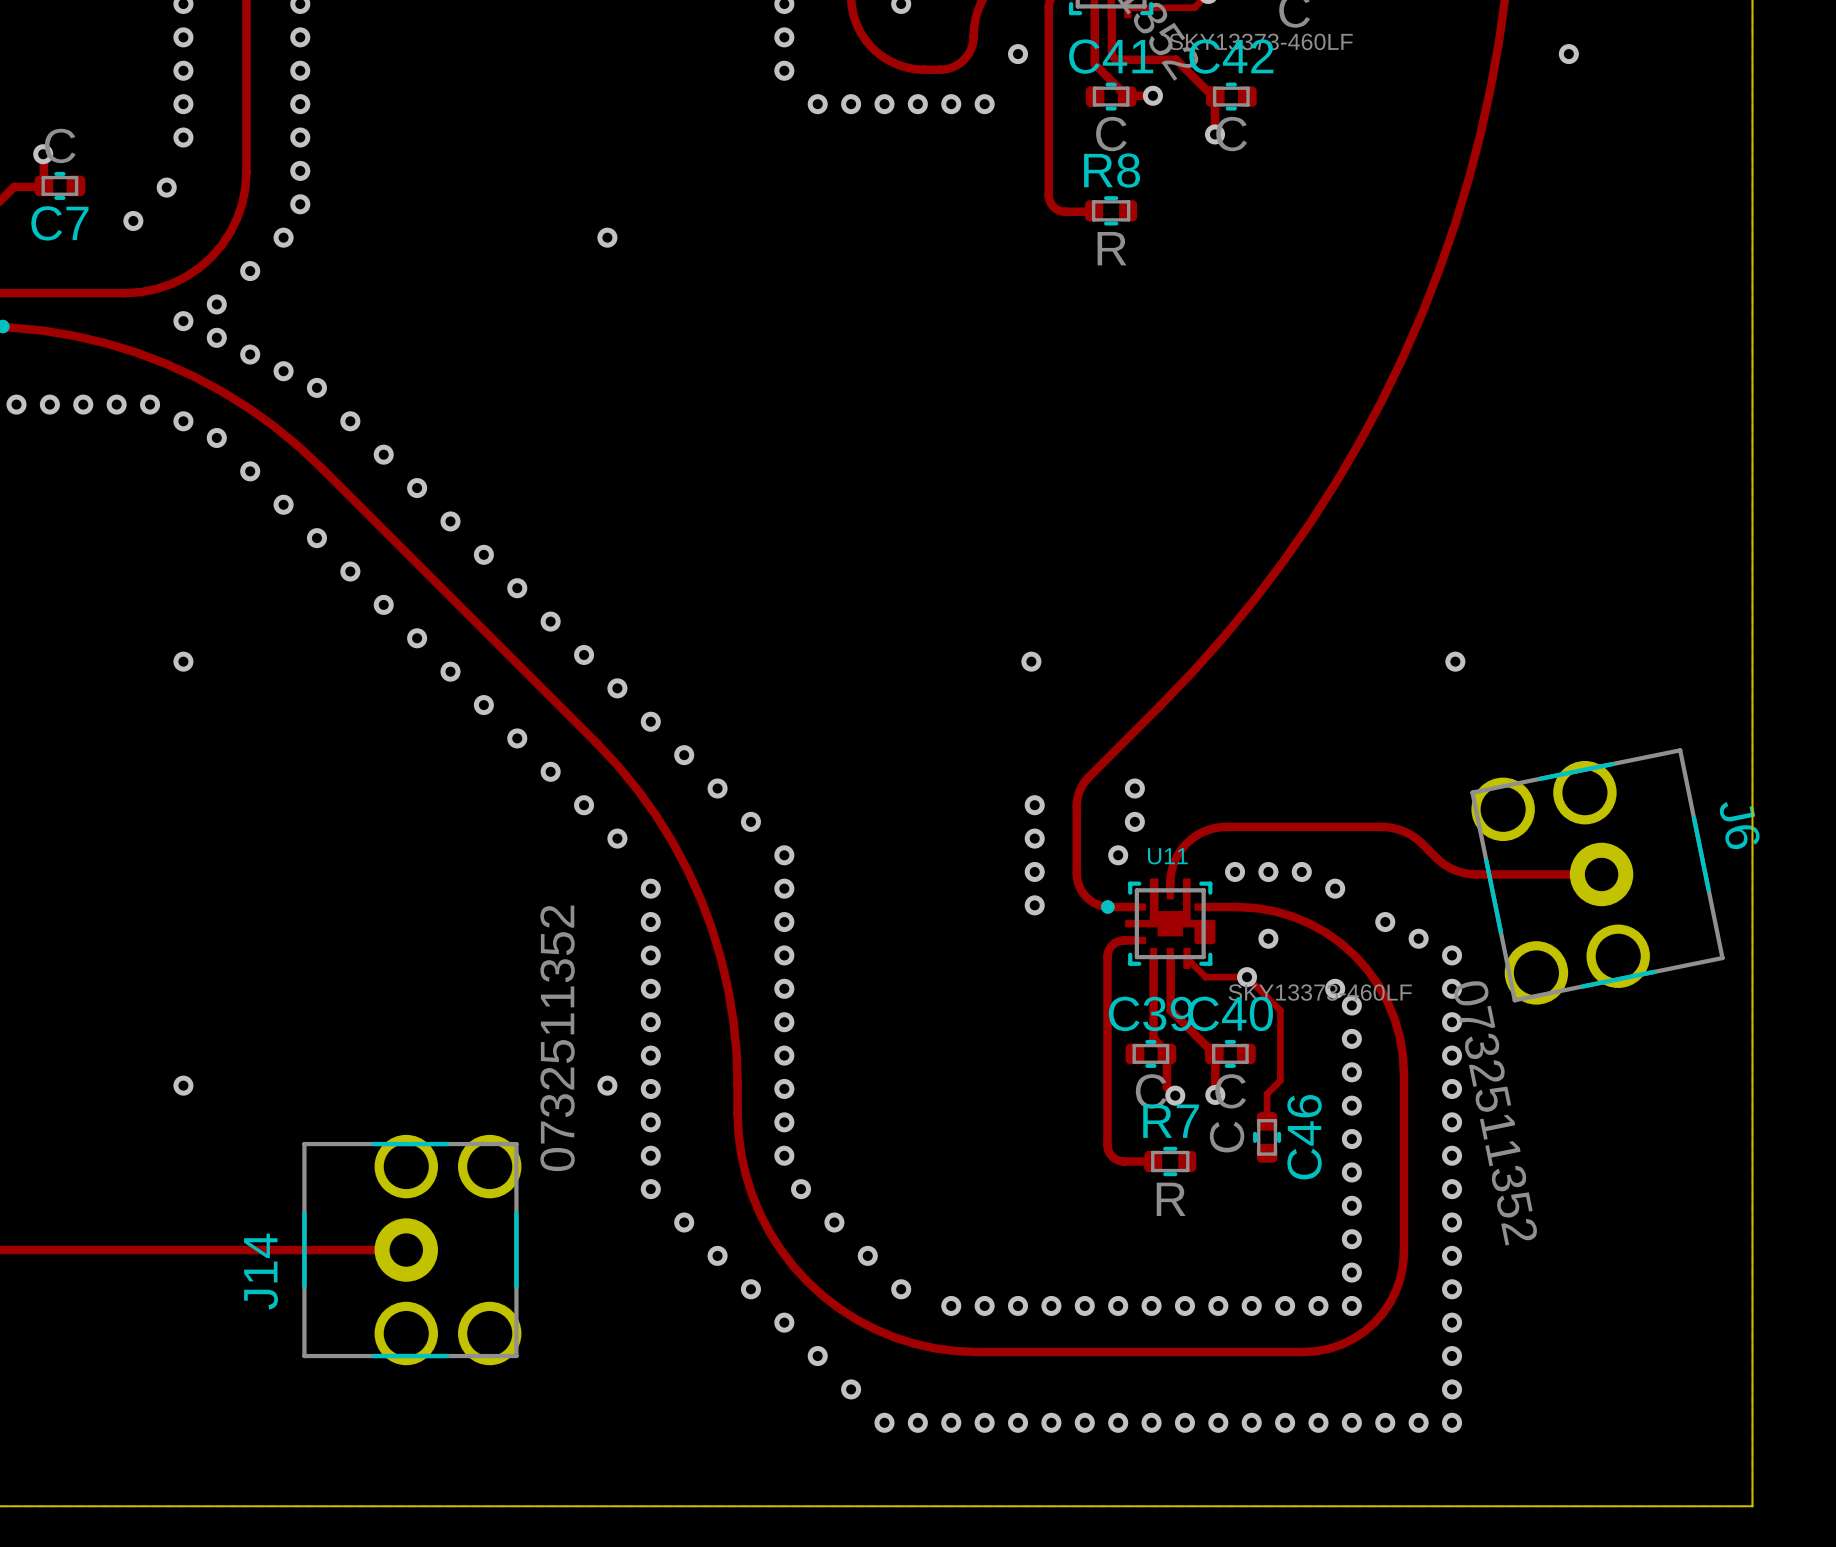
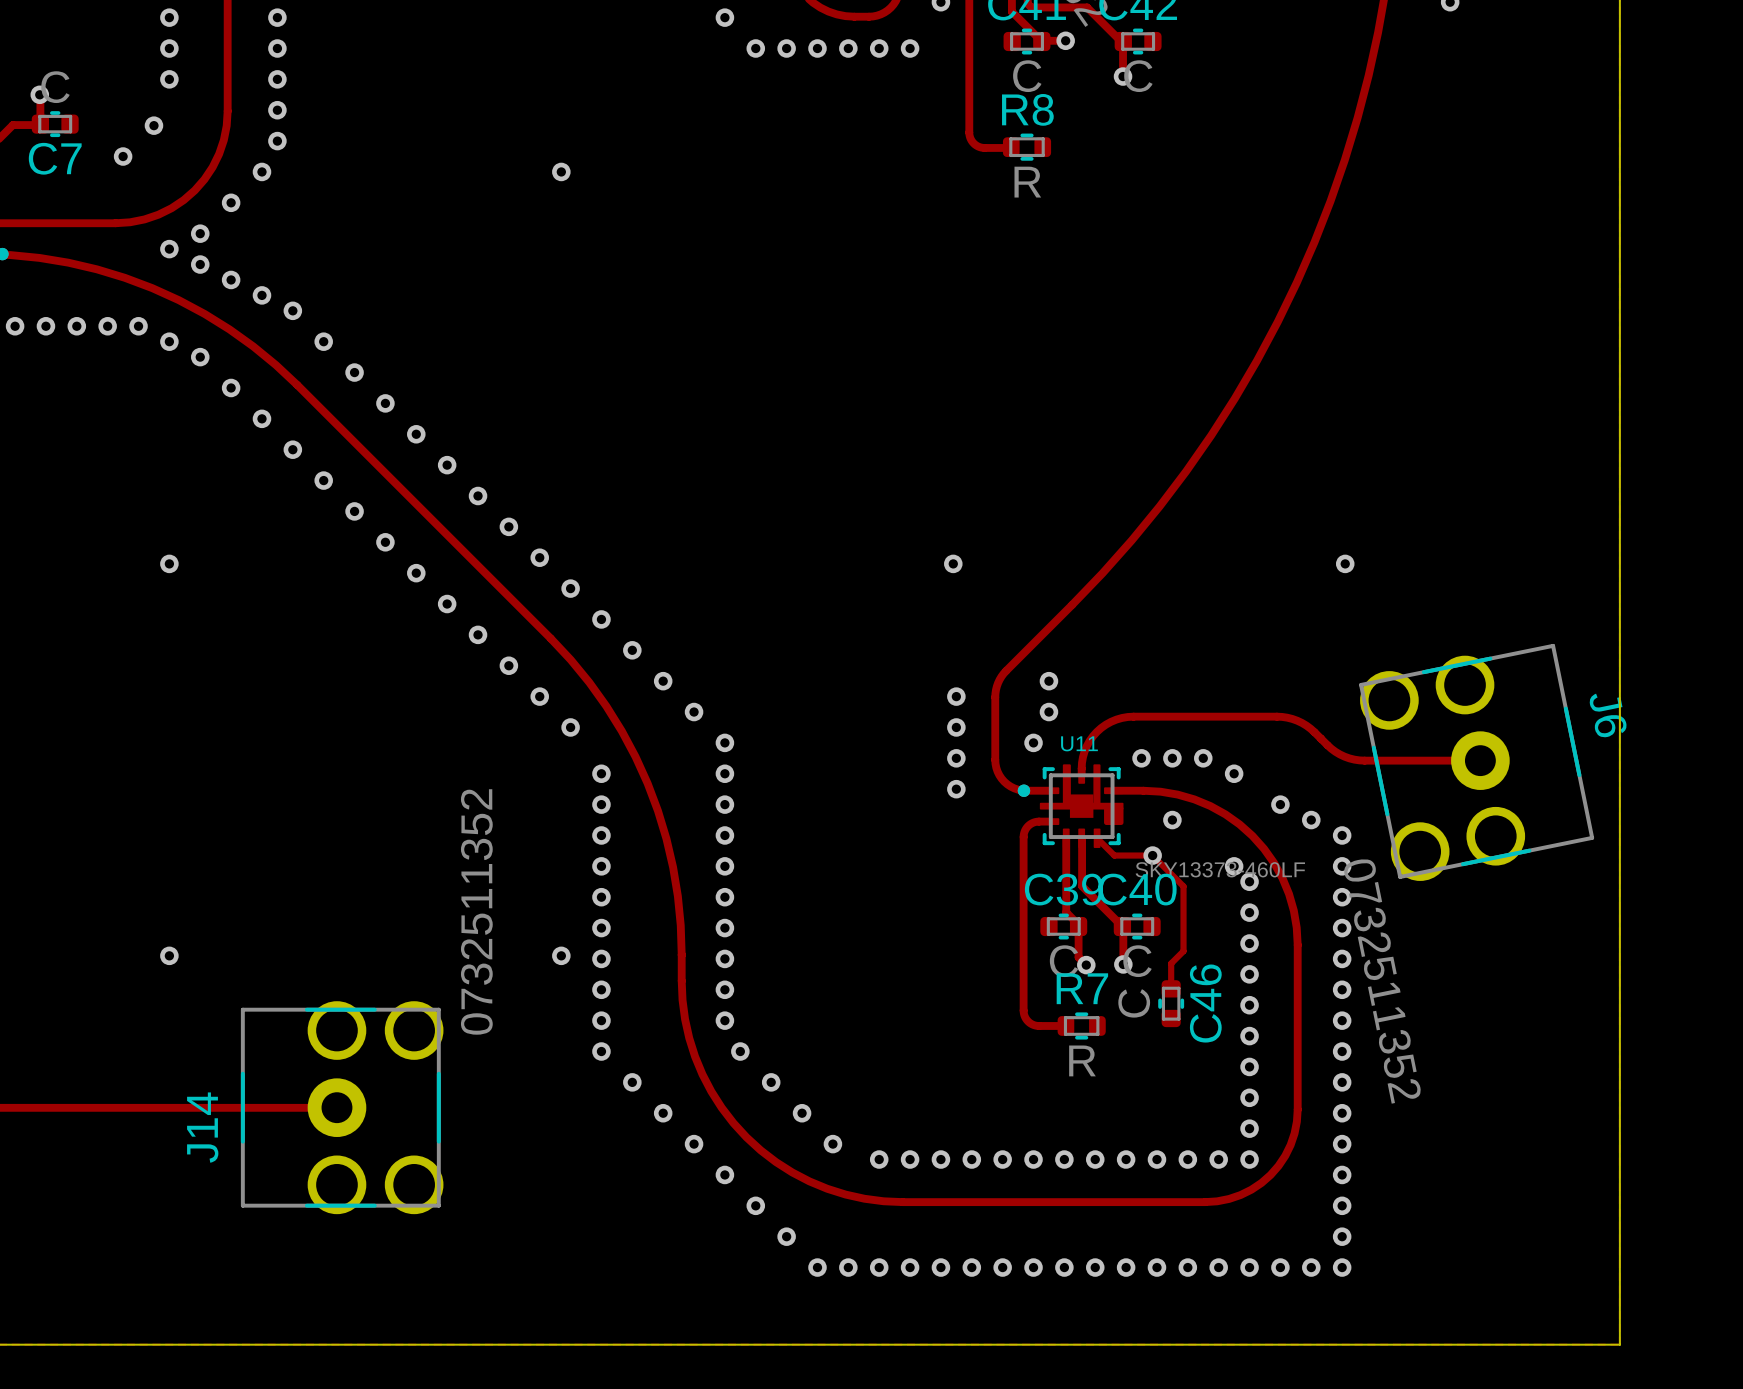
track: (333, 1250) (406, 1250) -> none
J14 position: (411, 1250) -> (342, 1107)

